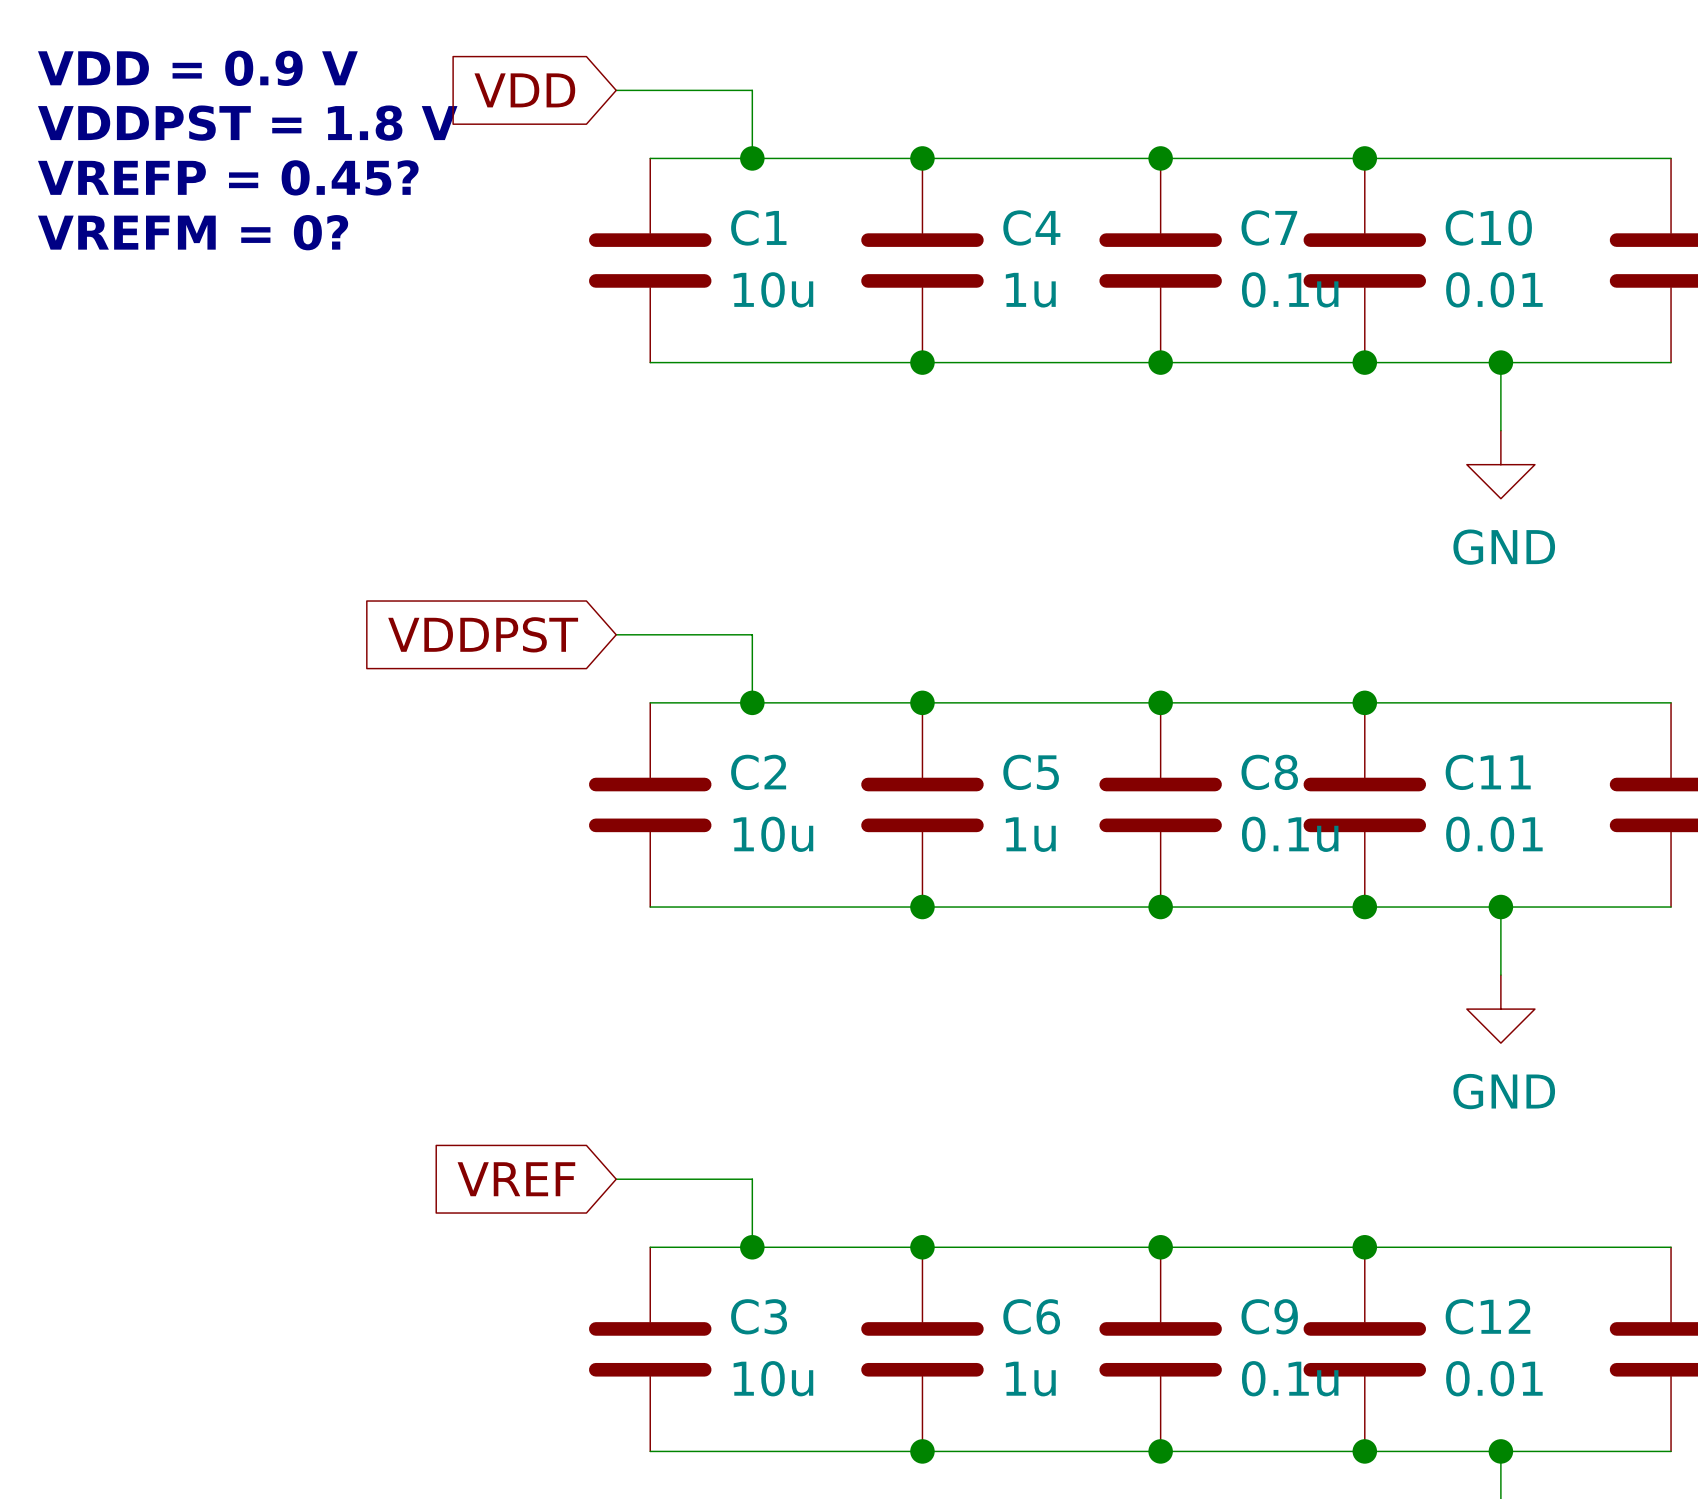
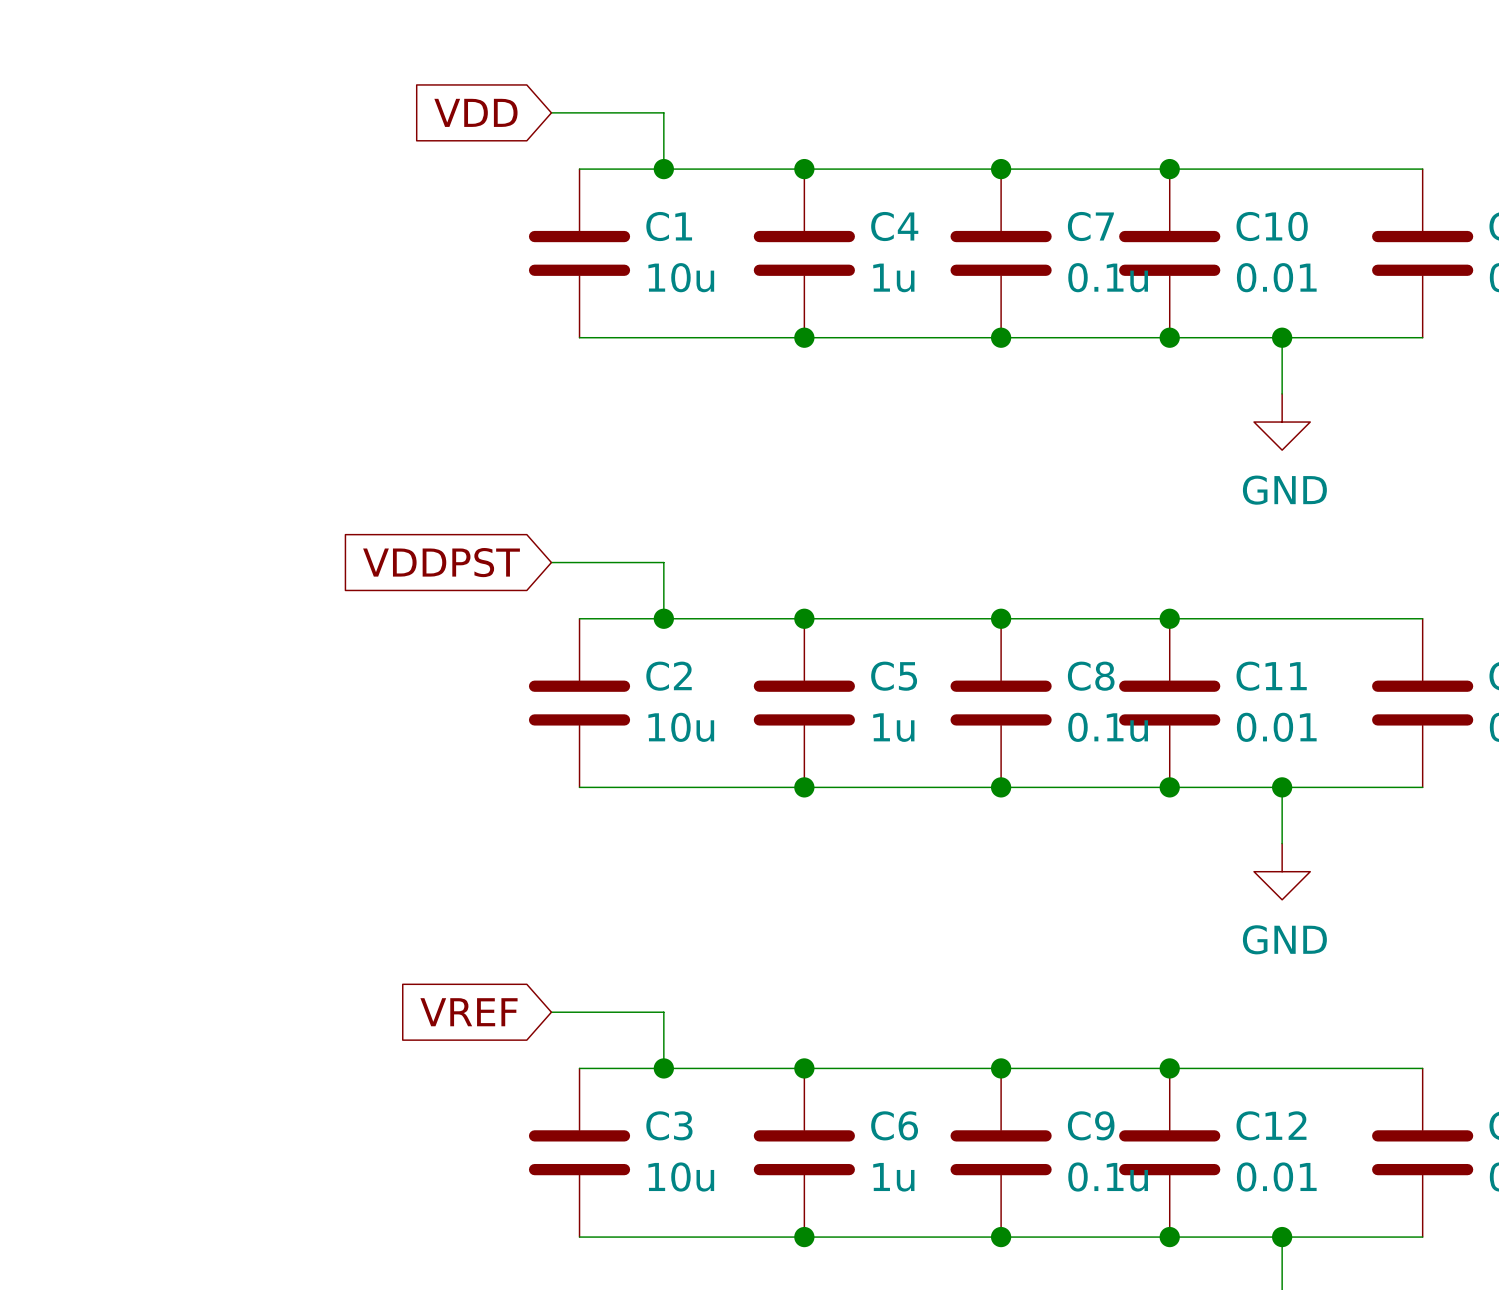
text: VDD = 0.9 V (197, 68) -> none
text: VDDPST = 1.8 V (247, 123) -> none
text: VREFP = 0.45? (228, 177) -> none
text: VREFM = 0? (193, 232) -> none

